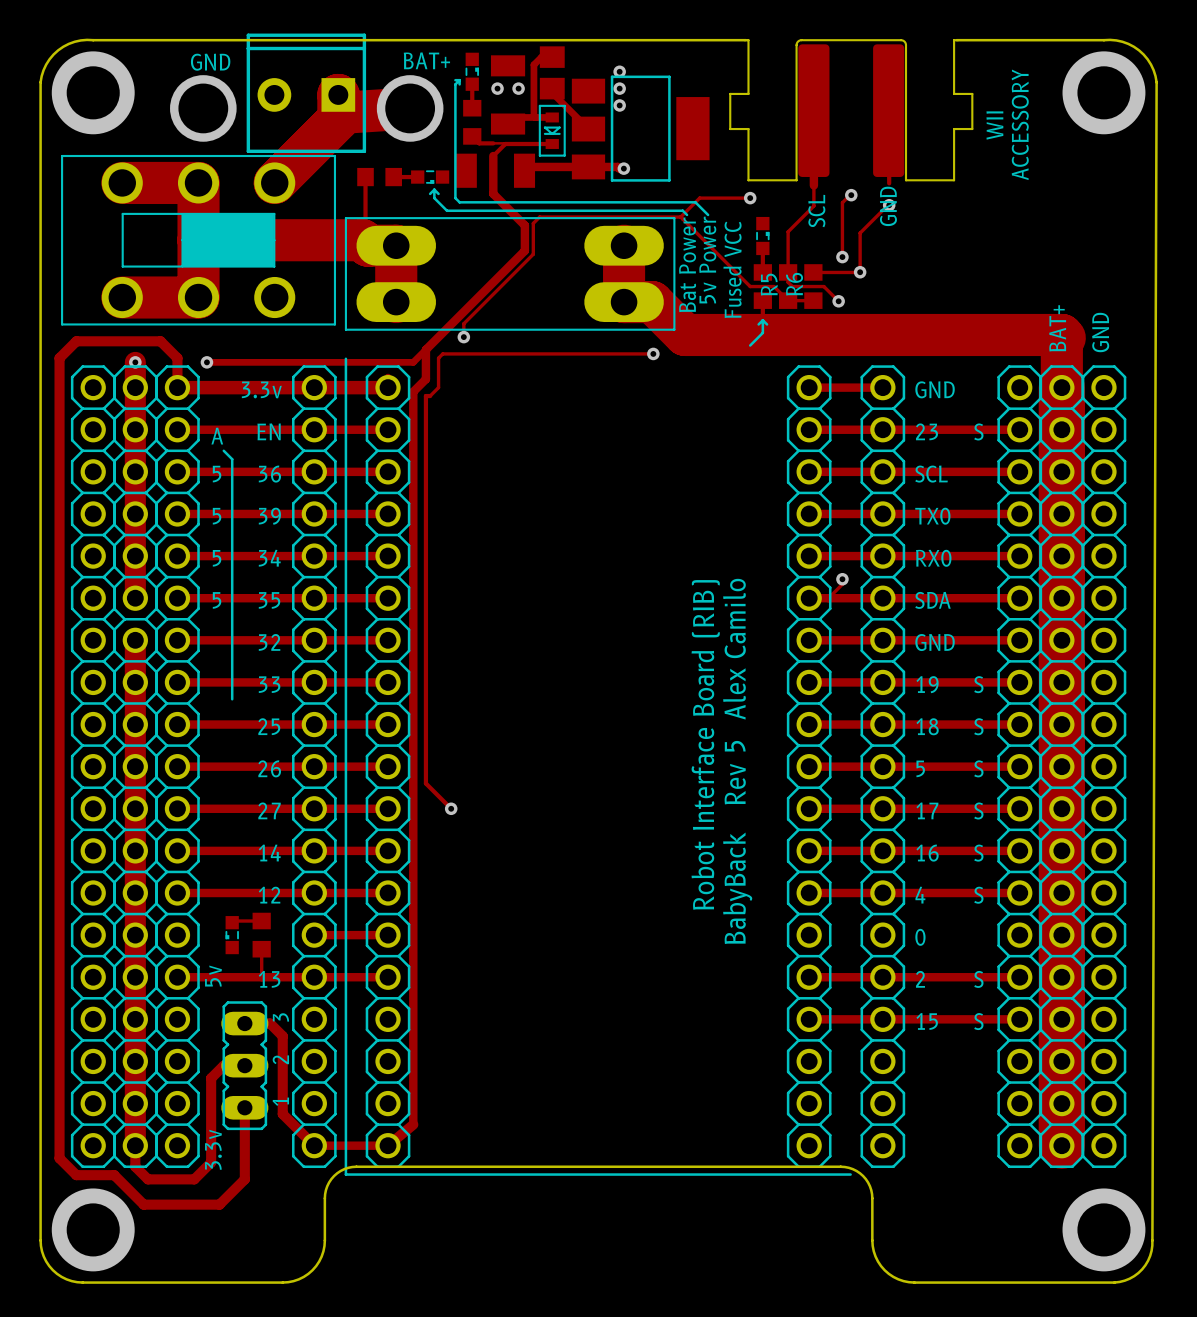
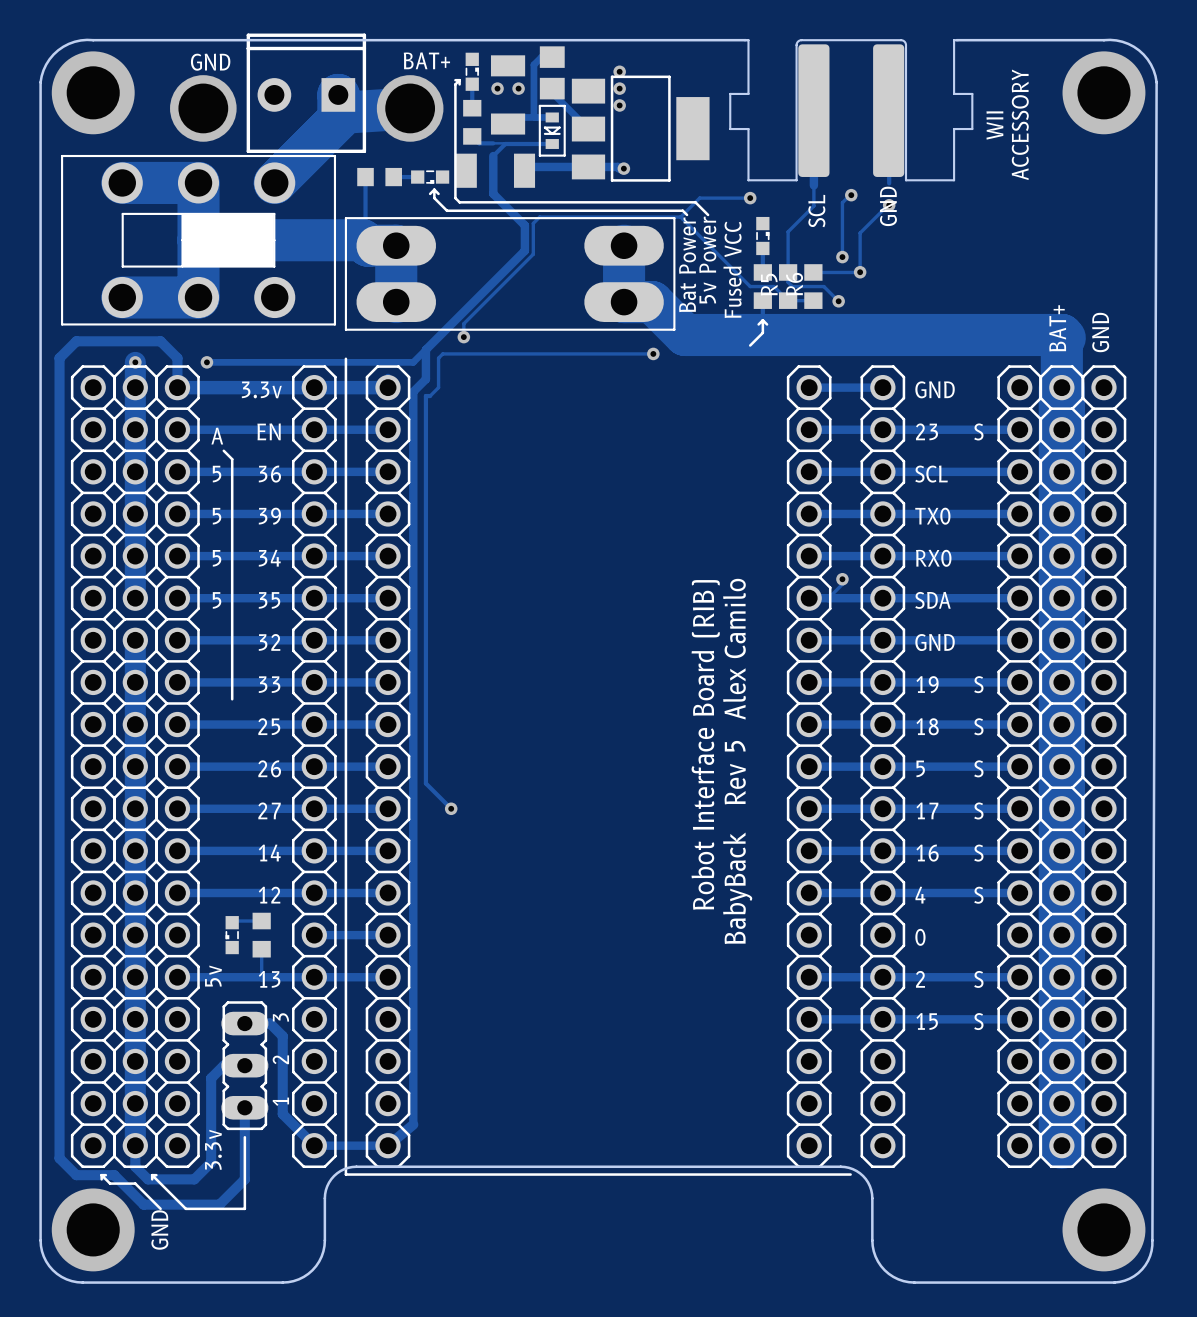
line: none -> (244, 1137) (244, 1208) (185, 1208) (152, 1175)
line: none -> (101, 1175) (110, 1183) (135, 1183) (160, 1208)
line: none -> (101, 1175) (101, 1179)
line: none -> (101, 1175) (105, 1175)
line: none -> (152, 1175) (156, 1175)
line: none -> (152, 1175) (152, 1179)
text: none -> GND (159, 1230)

